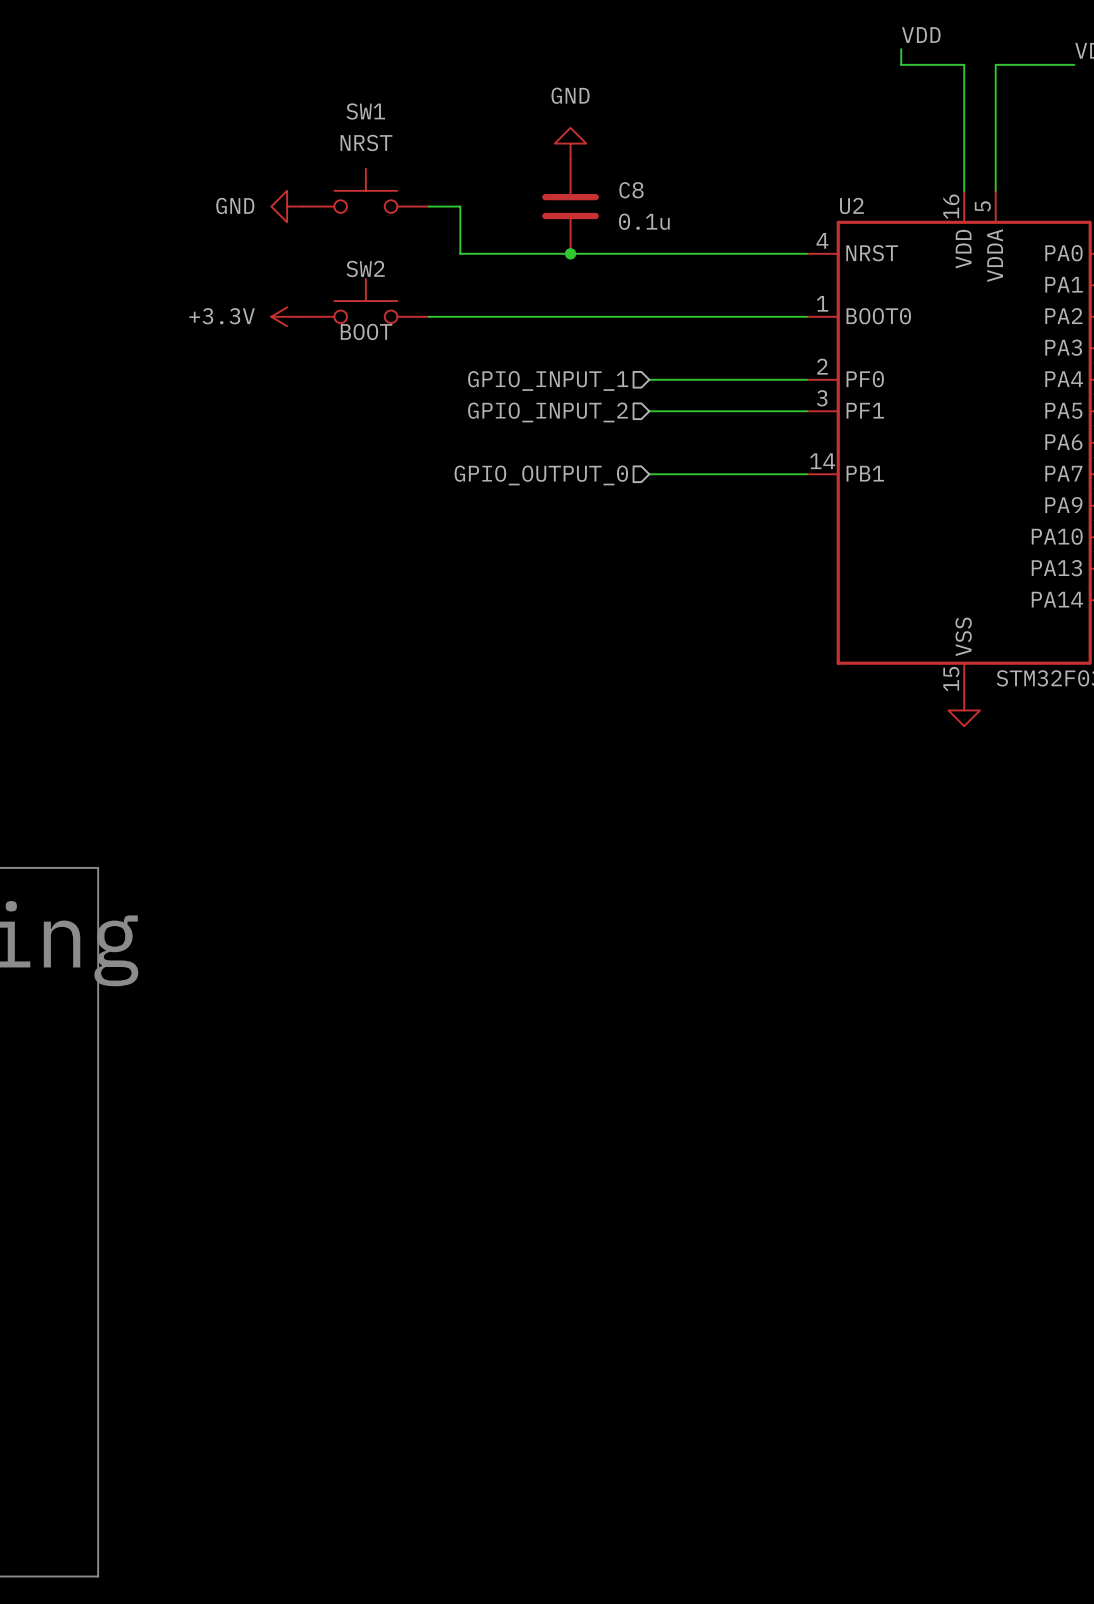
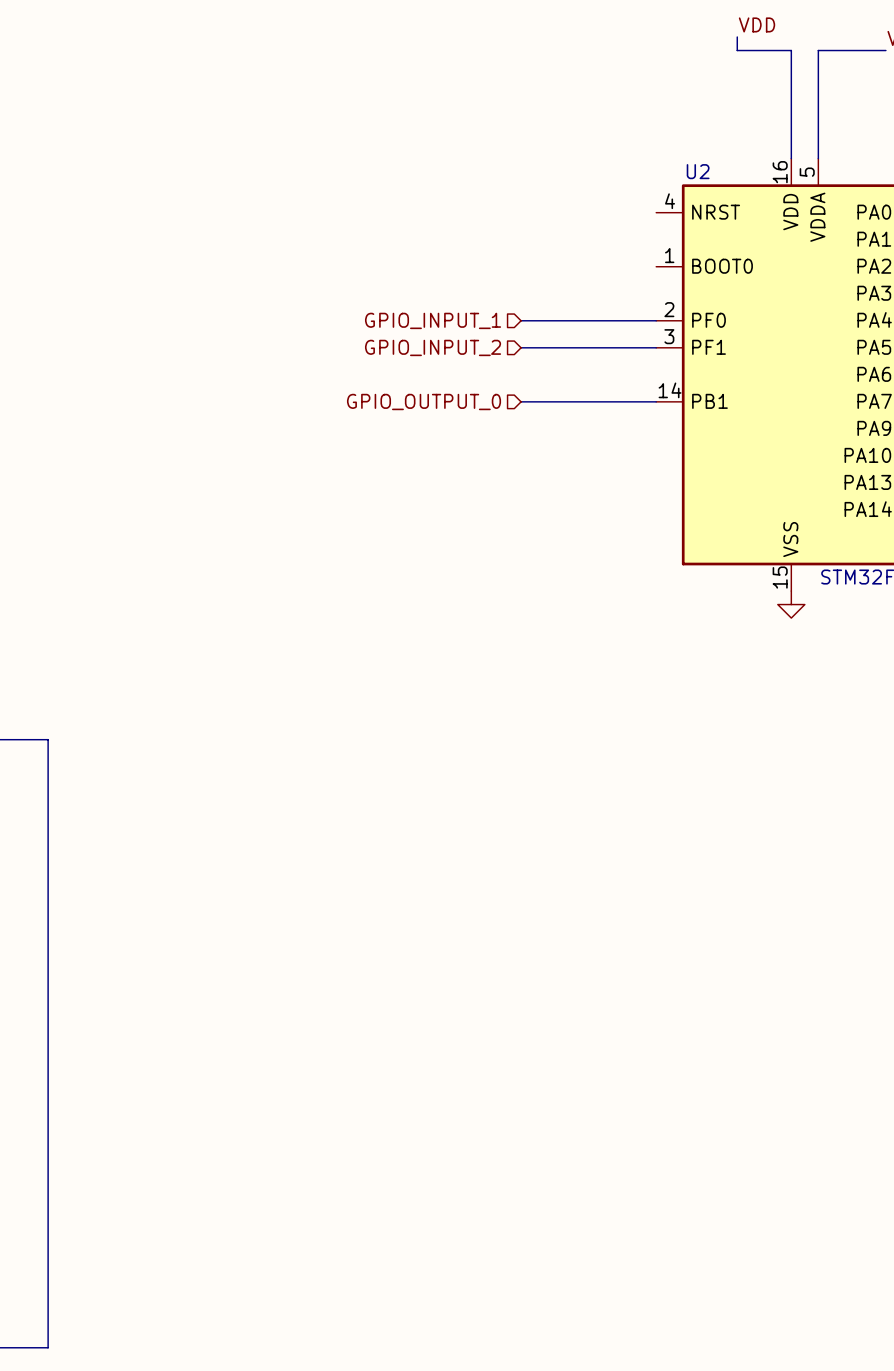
power symbol: GND (570, 143) -> none
SW1: NRST (365, 190) -> none
power symbol: GND (287, 206) -> none
wire: (428, 206) (460, 206) (460, 253) (806, 253) -> none
C8: 0.1u (570, 206) -> none
junction: (570, 253) -> none
SW2: BOOT (365, 301) -> none
power symbol: +3.3V (287, 316) -> none
wire: (428, 316) (806, 316) -> none

